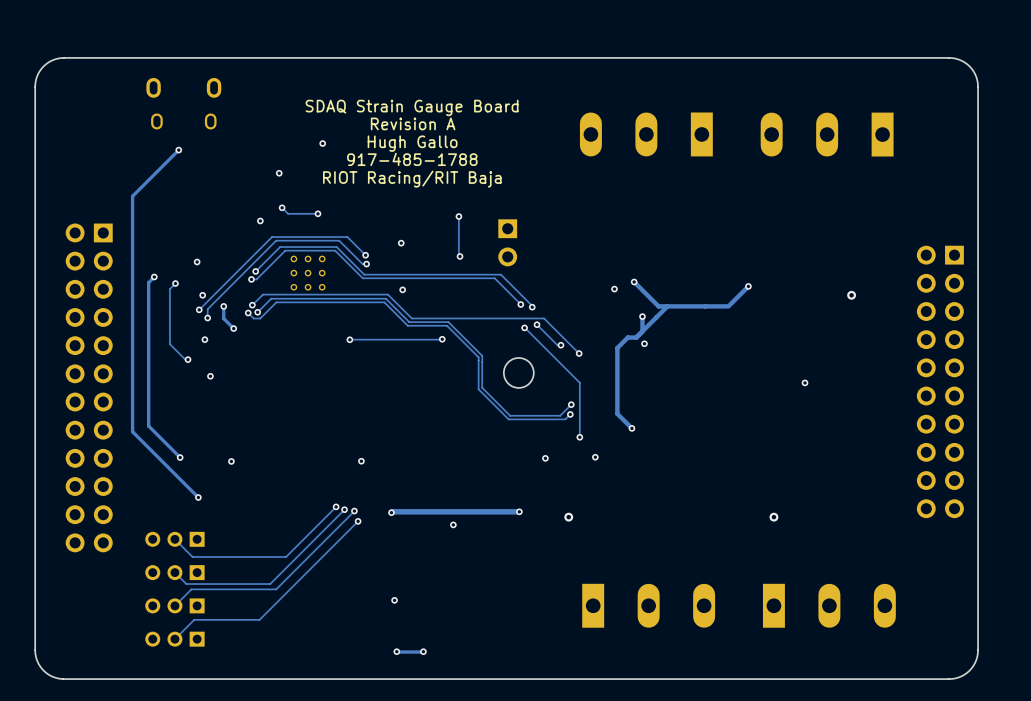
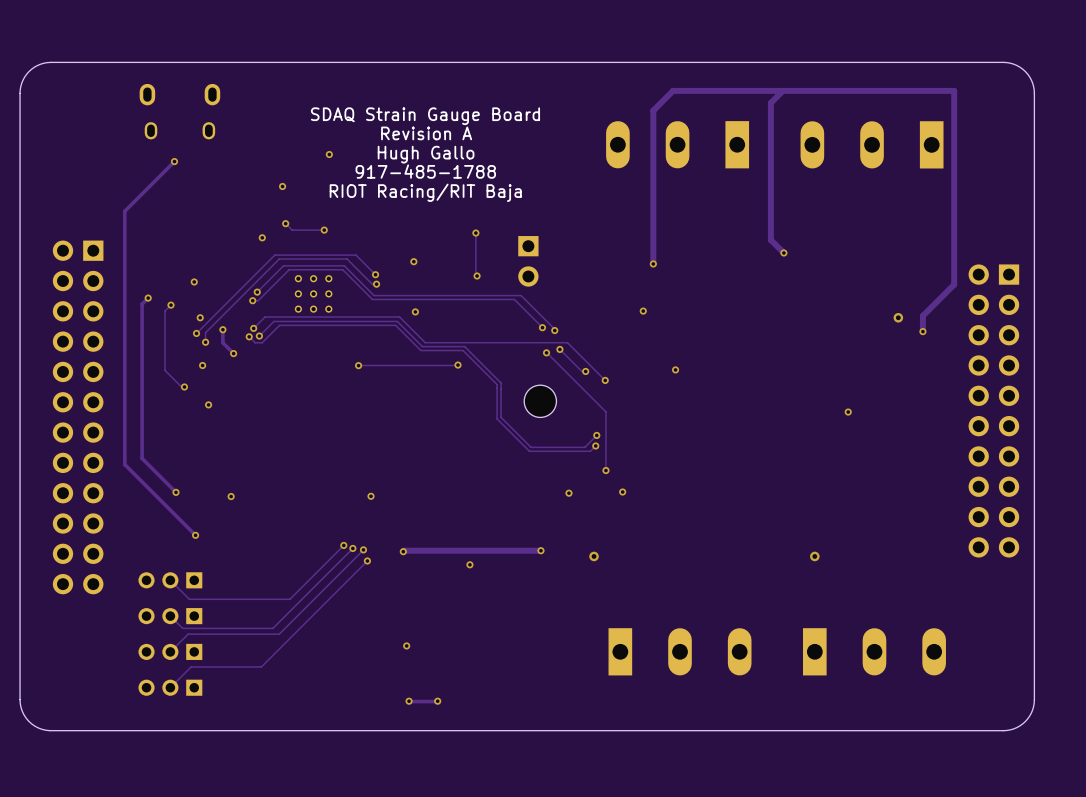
track: none -> (782, 90) (770, 102) (770, 239) (783, 252)
track: none -> (653, 263) (653, 110) (673, 90) (954, 90) (954, 284) (922, 315) (922, 331)
via: none -> (653, 263)
track: (634, 281) (658, 306) (728, 306) (748, 286) -> none
via: (634, 281) -> none
via position: (748, 286) -> (783, 252)
track: (667, 306) (636, 337) (627, 337) (617, 348) (617, 413) (631, 428) -> none
via: none -> (922, 331)
track: (642, 316) (642, 331) -> none
via: (642, 316) -> none
via: (631, 428) -> none

